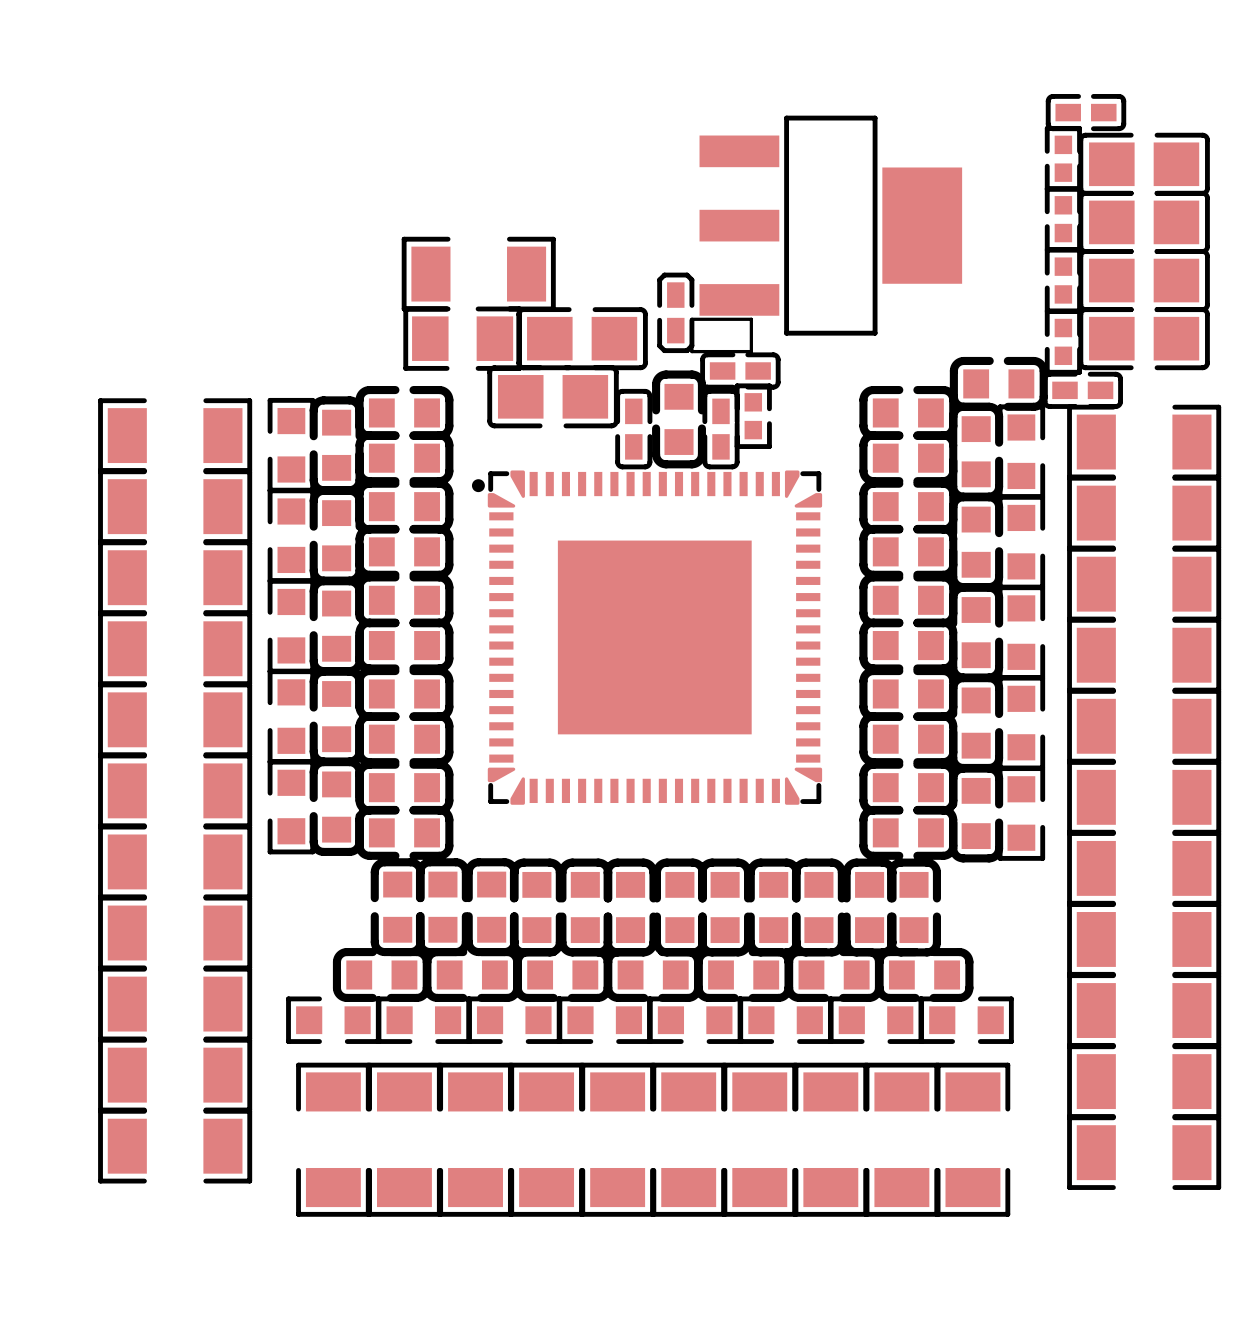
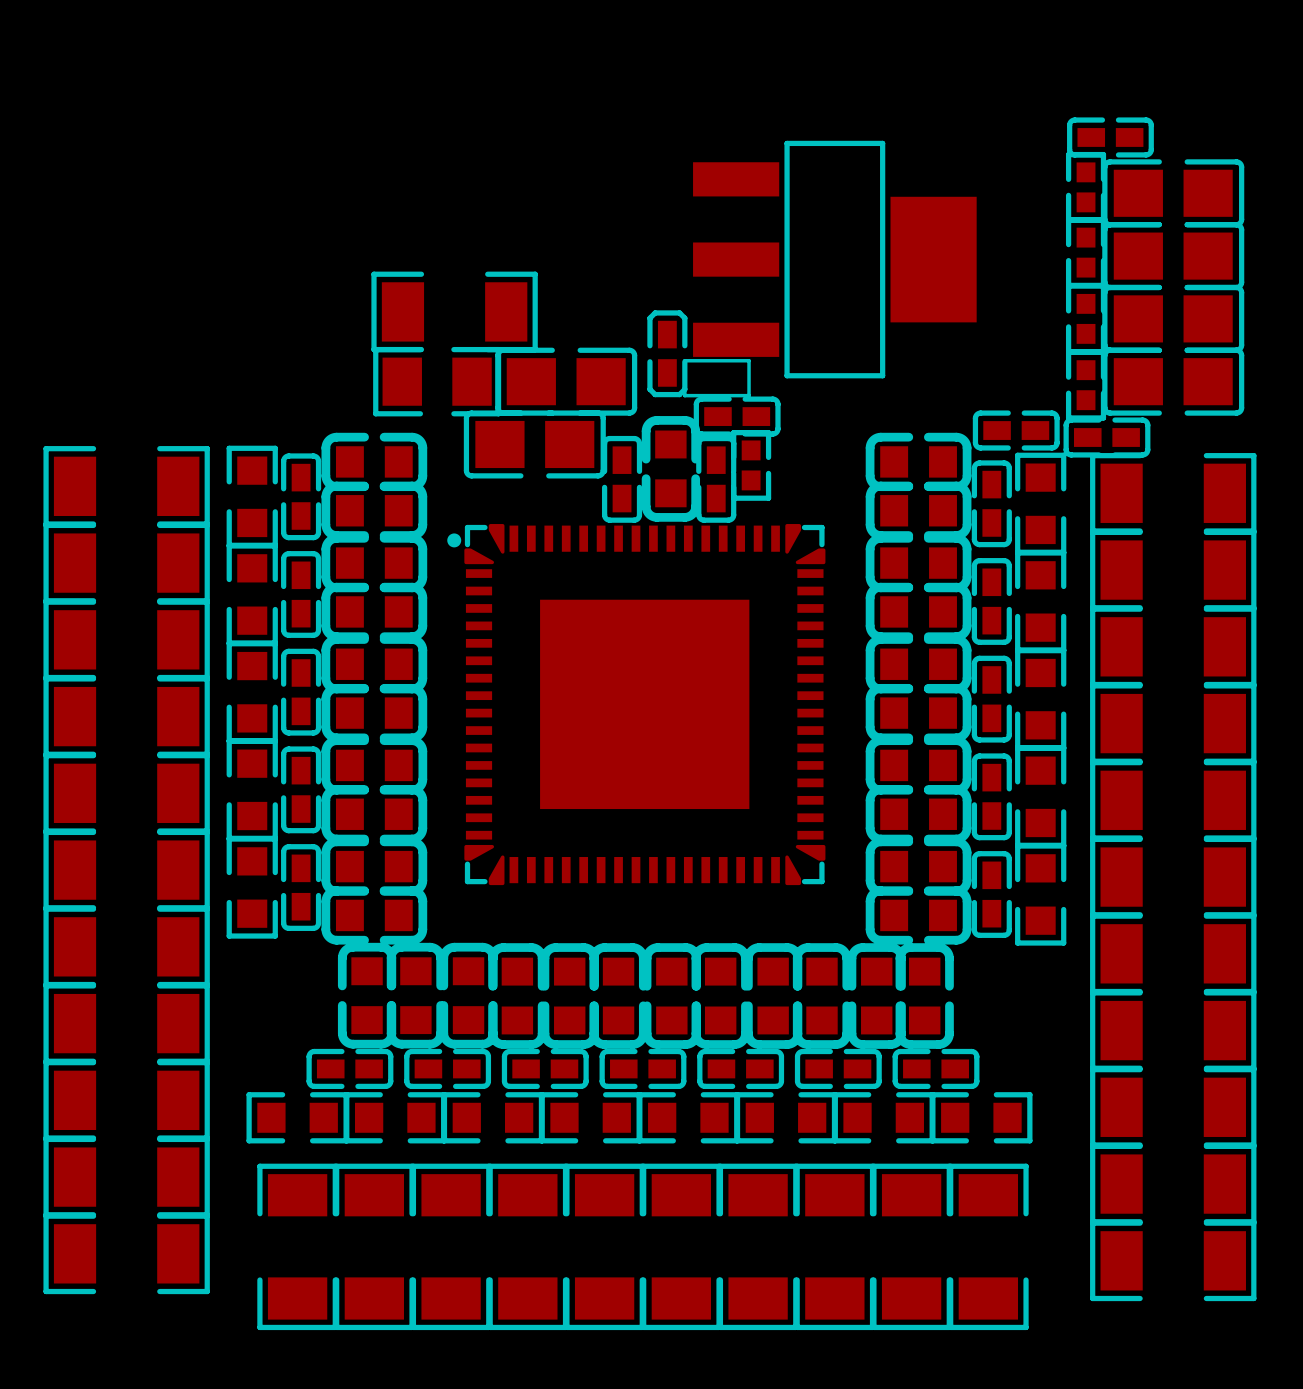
part footprint: [949, 356, 1048, 411] -> [972, 410, 1060, 451]
part footprint: [309, 396, 364, 495] -> [281, 453, 322, 541]
part footprint: [949, 402, 1004, 501] -> [971, 460, 1012, 548]
part footprint: [309, 486, 364, 585] -> [281, 551, 322, 638]
part footprint: [949, 493, 1004, 592] -> [971, 558, 1012, 645]
part footprint: [309, 577, 364, 676] -> [281, 648, 322, 736]
part footprint: [949, 583, 1004, 682] -> [971, 655, 1012, 743]
part footprint: [309, 667, 364, 766] -> [281, 746, 322, 834]
part footprint: [949, 674, 1004, 772] -> [971, 753, 1012, 841]
part footprint: [309, 758, 364, 856] -> [281, 844, 322, 931]
part footprint: [949, 764, 1004, 863] -> [971, 851, 1012, 938]
part footprint: [332, 948, 431, 1002] -> [306, 1048, 394, 1090]
part footprint: [423, 948, 522, 1002] -> [404, 1048, 492, 1090]
part footprint: [513, 948, 612, 1002] -> [501, 1048, 589, 1090]
part footprint: [604, 948, 703, 1002] -> [599, 1048, 687, 1090]
part footprint: [694, 948, 793, 1002] -> [697, 1048, 785, 1090]
part footprint: [785, 948, 883, 1002] -> [794, 1048, 882, 1090]
part footprint: [875, 948, 974, 1002] -> [892, 1048, 980, 1090]

